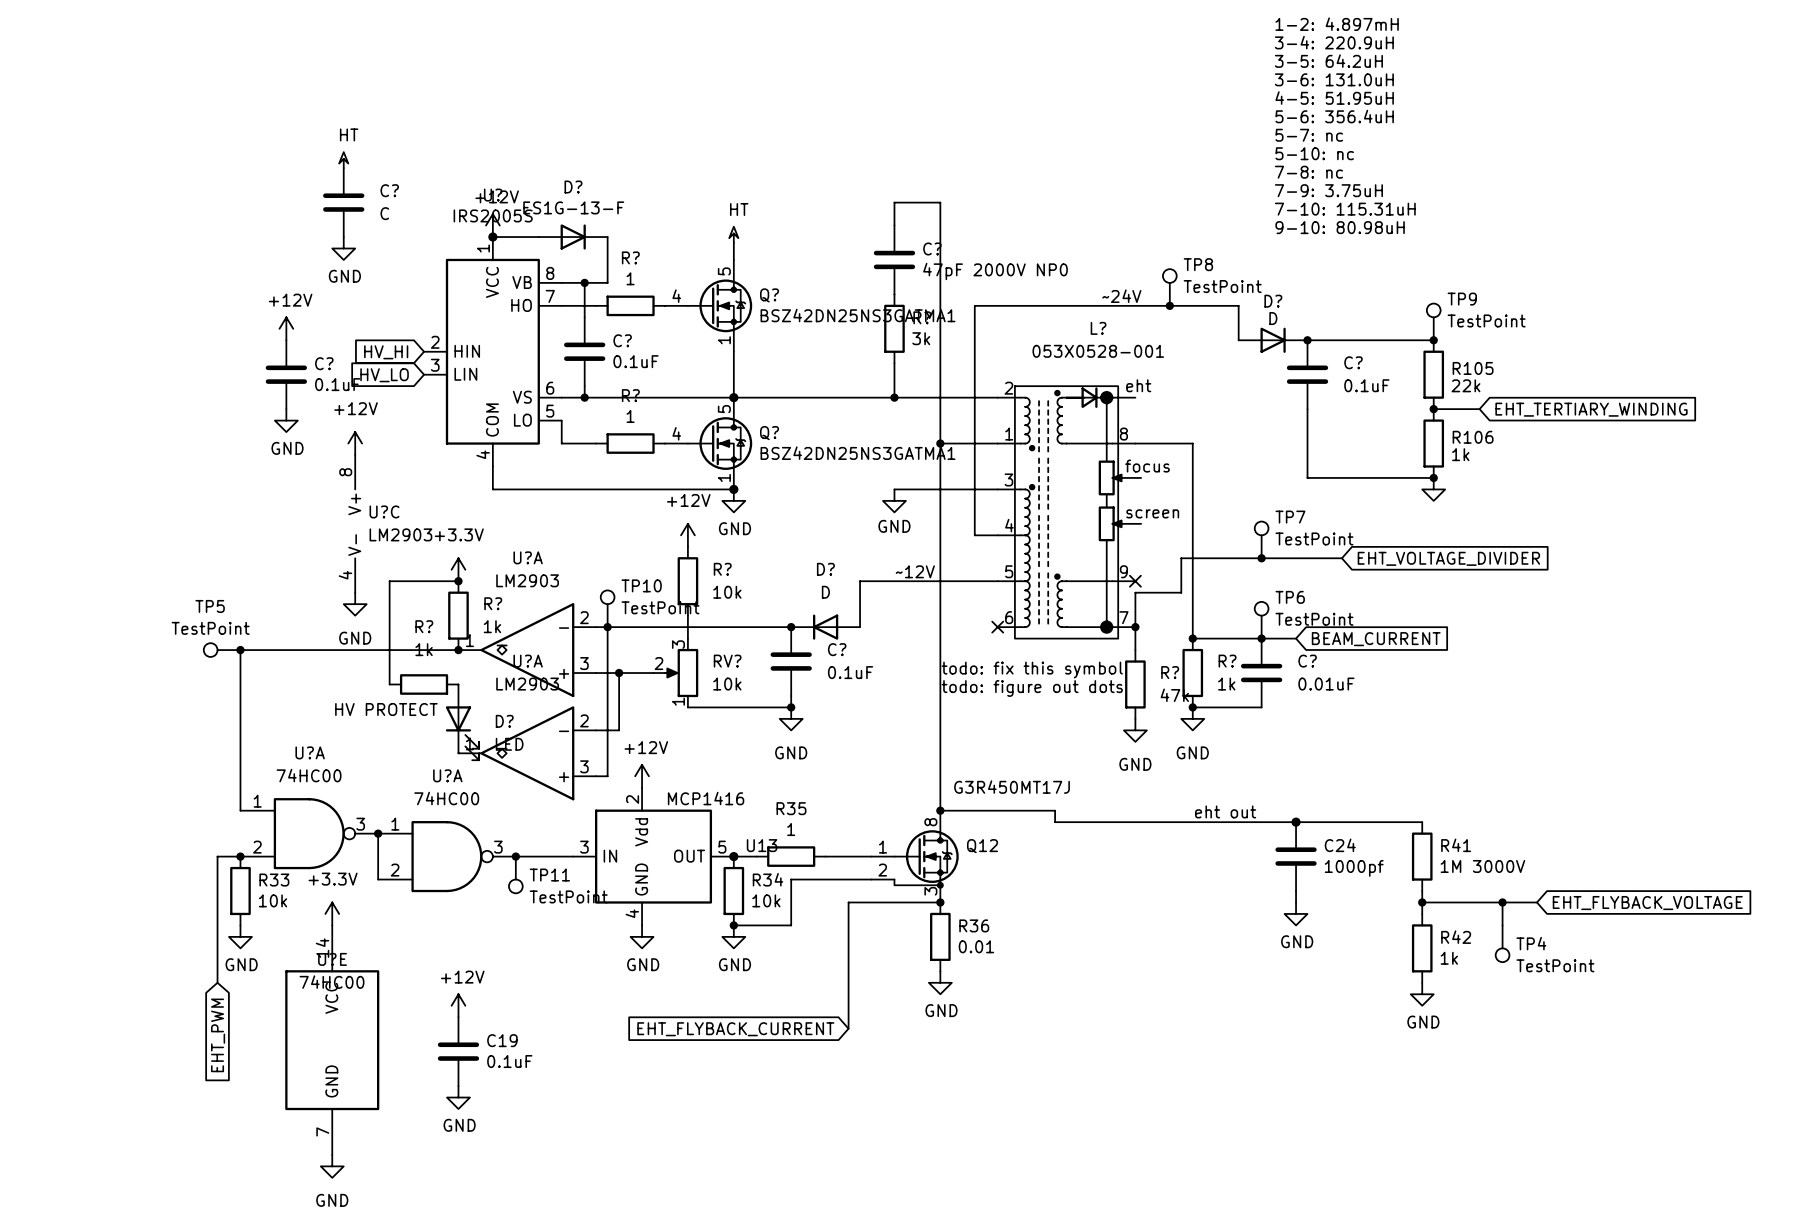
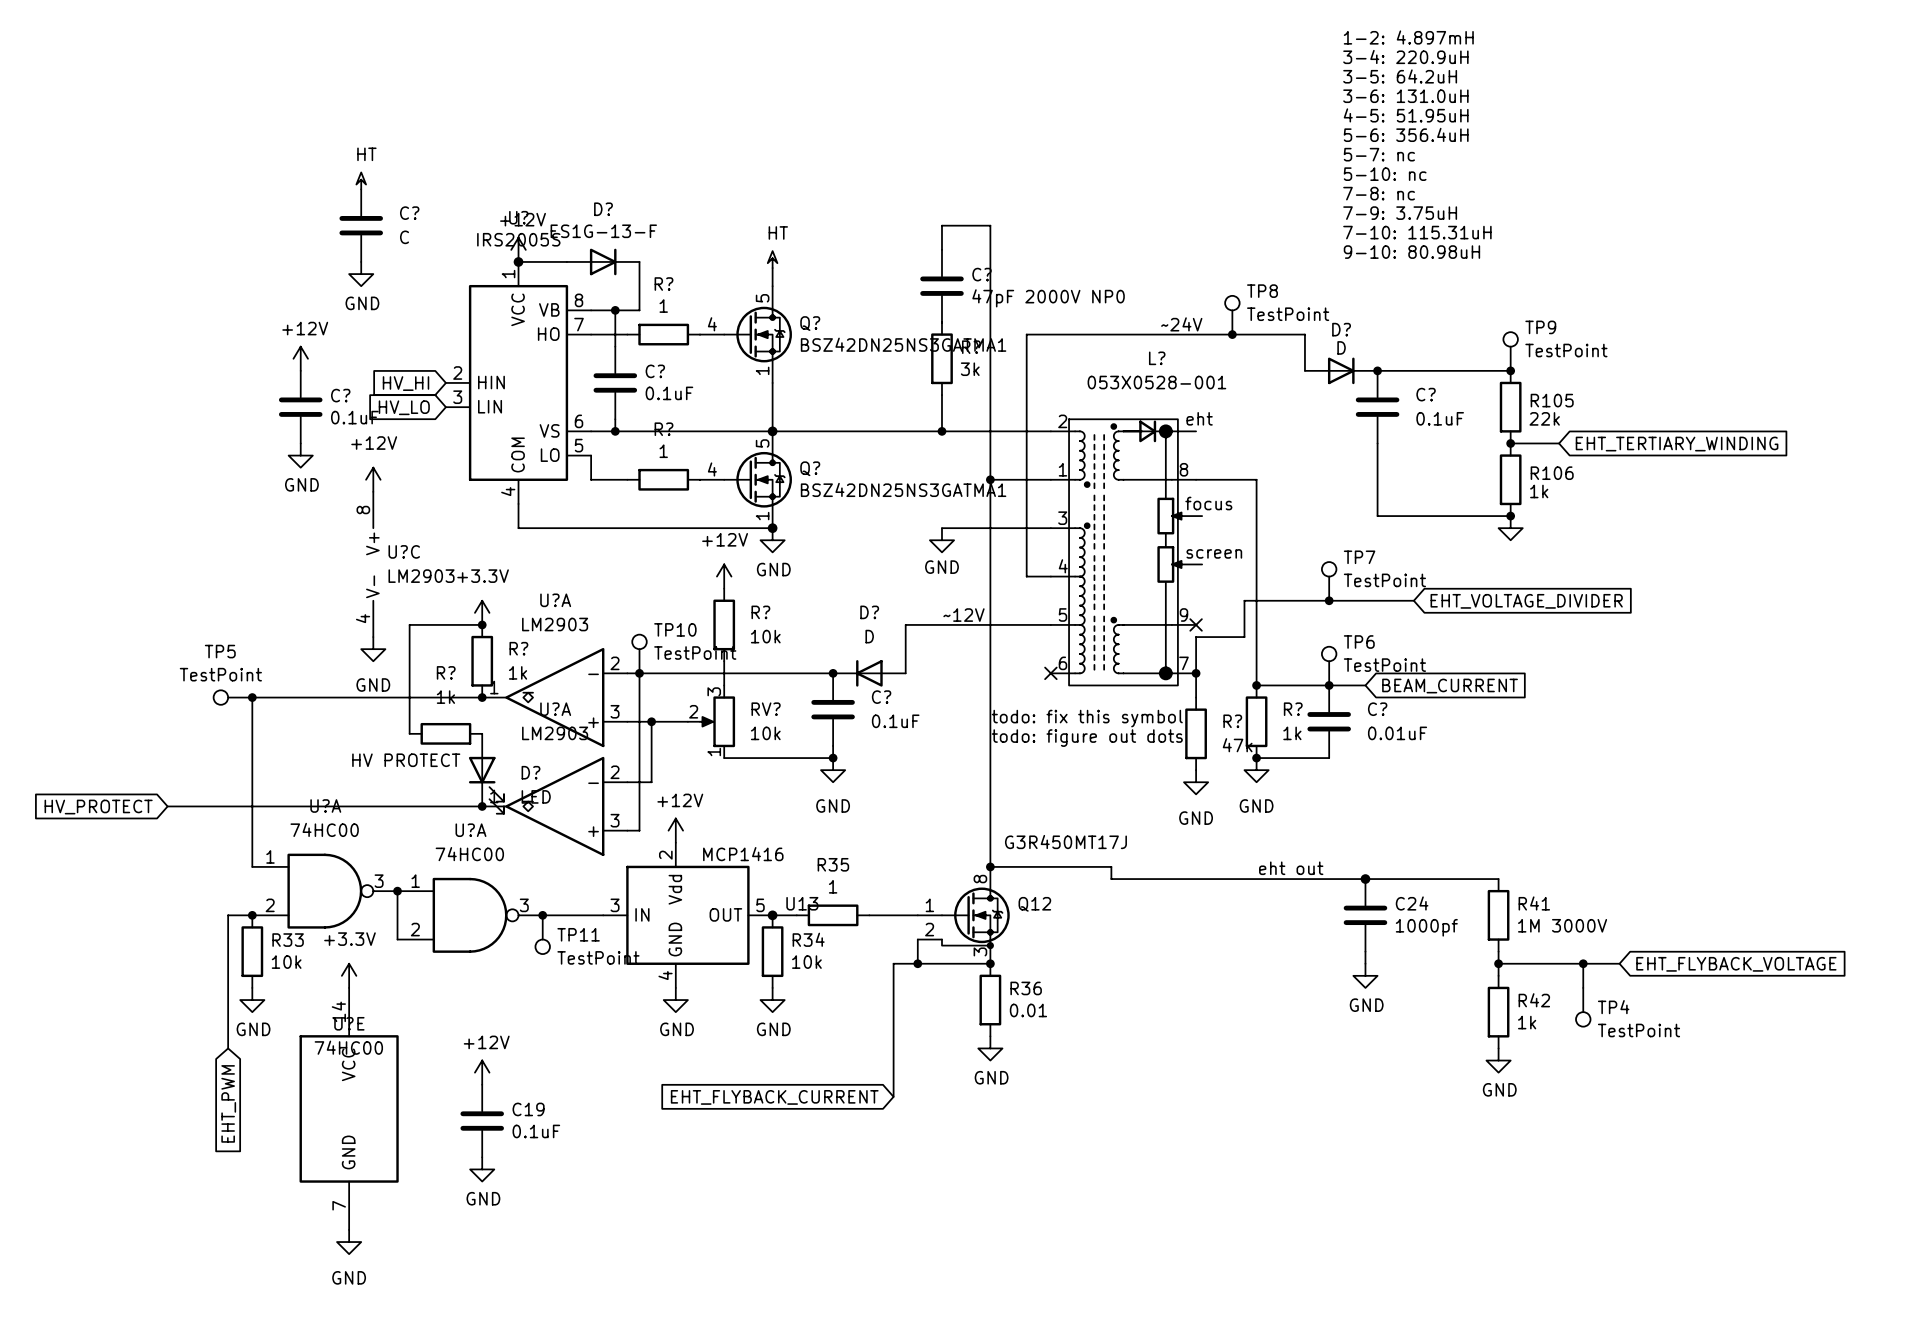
global label: none -> HV_PROTECT (98, 807)
wire: none -> (167, 806) (482, 806)
junction: none -> (482, 806)
wire: (871, 879) (791, 879) (791, 925) (733, 925) -> (917, 939) (917, 963)
junction: none -> (917, 963)
junction: (733, 925) -> none

